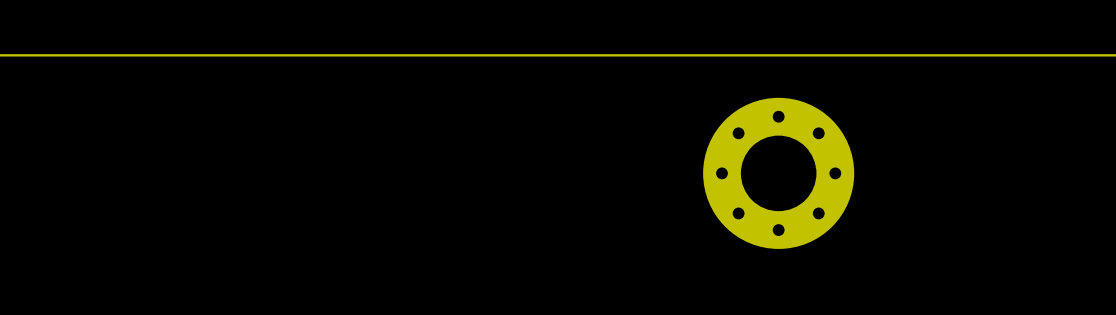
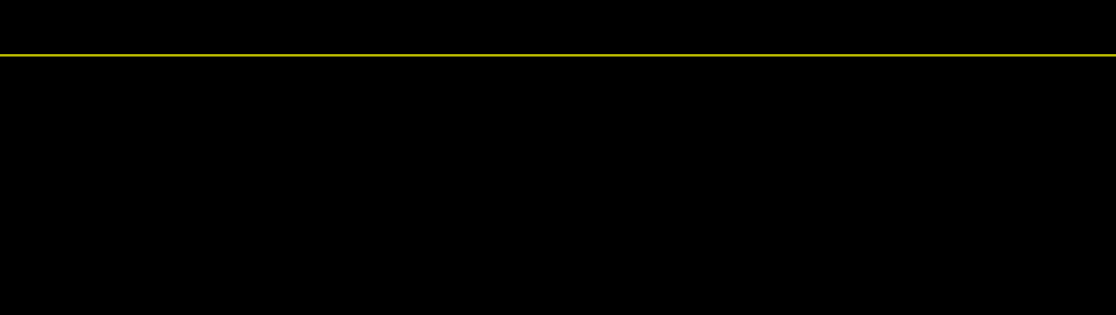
part: (778, 173) -> none

